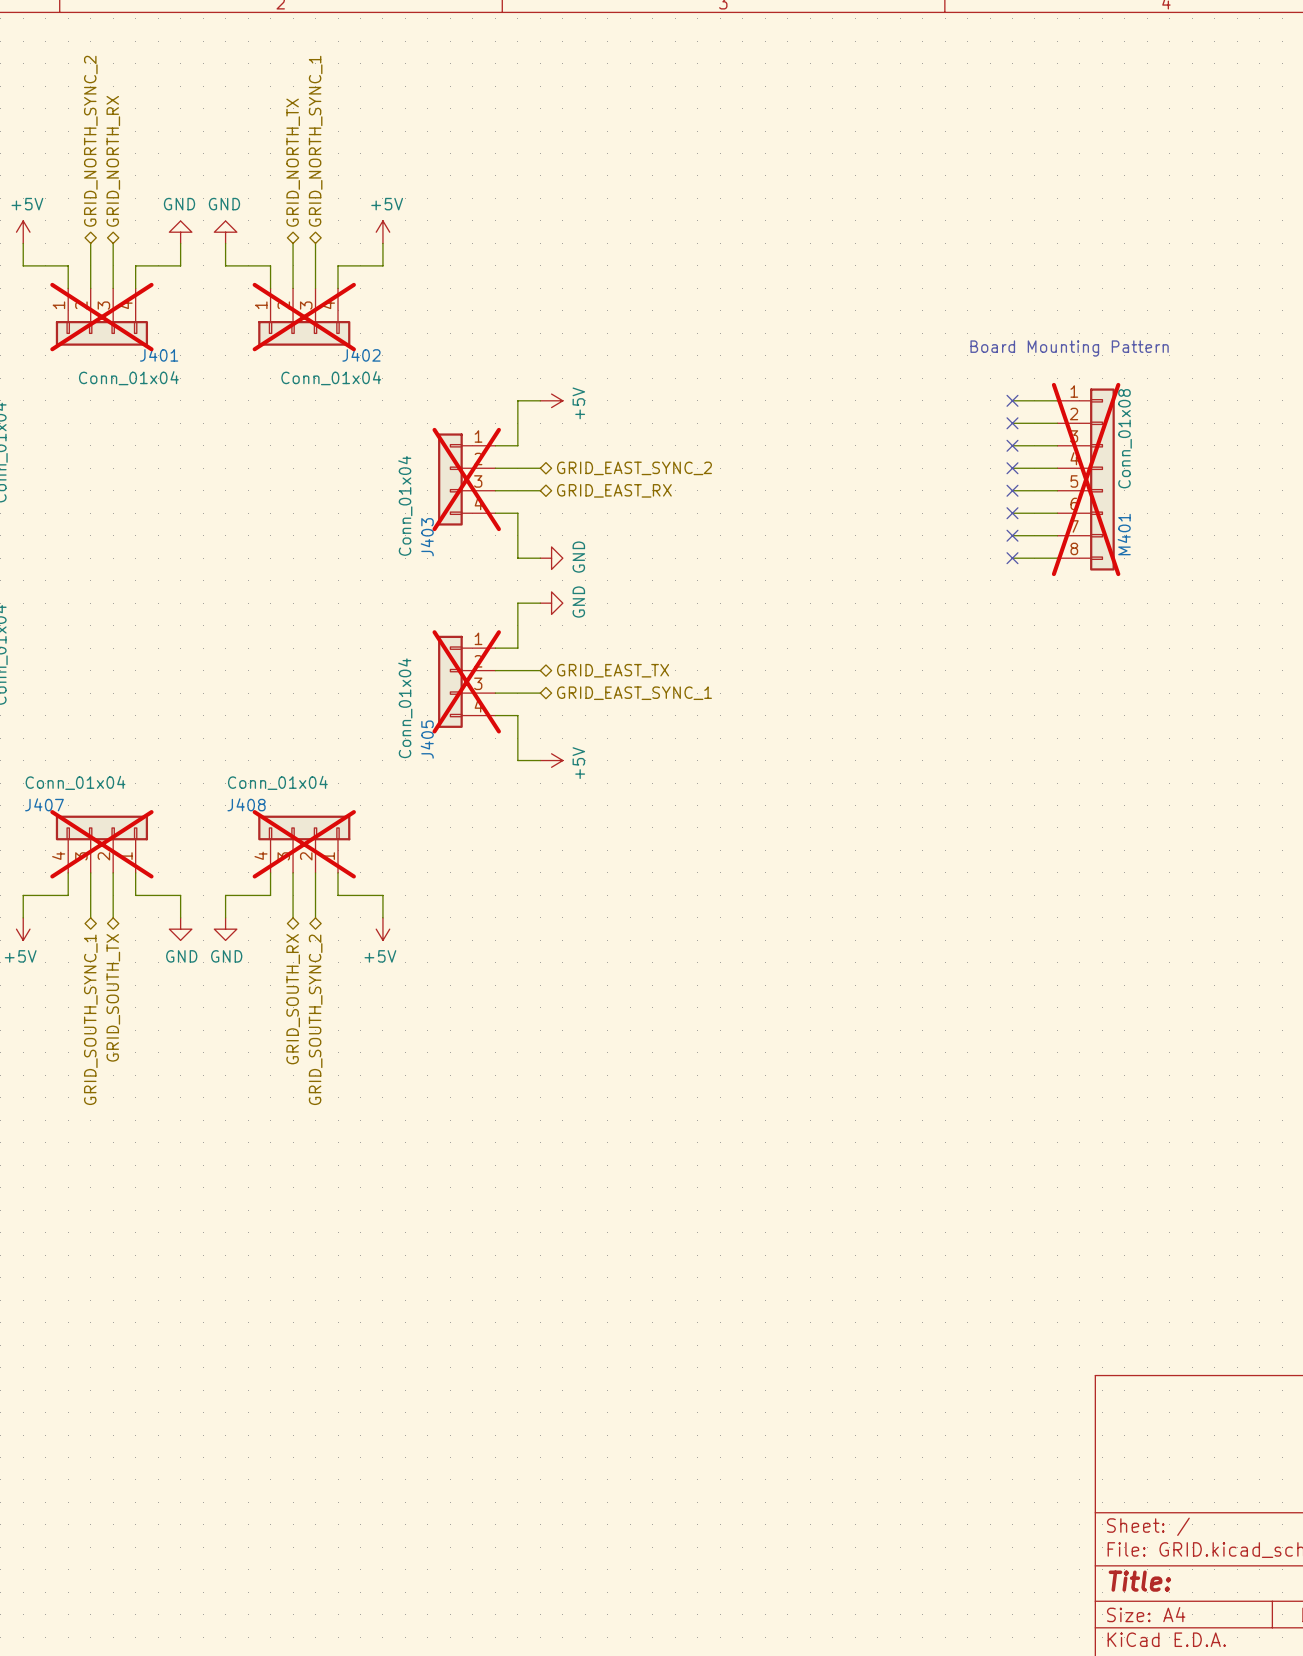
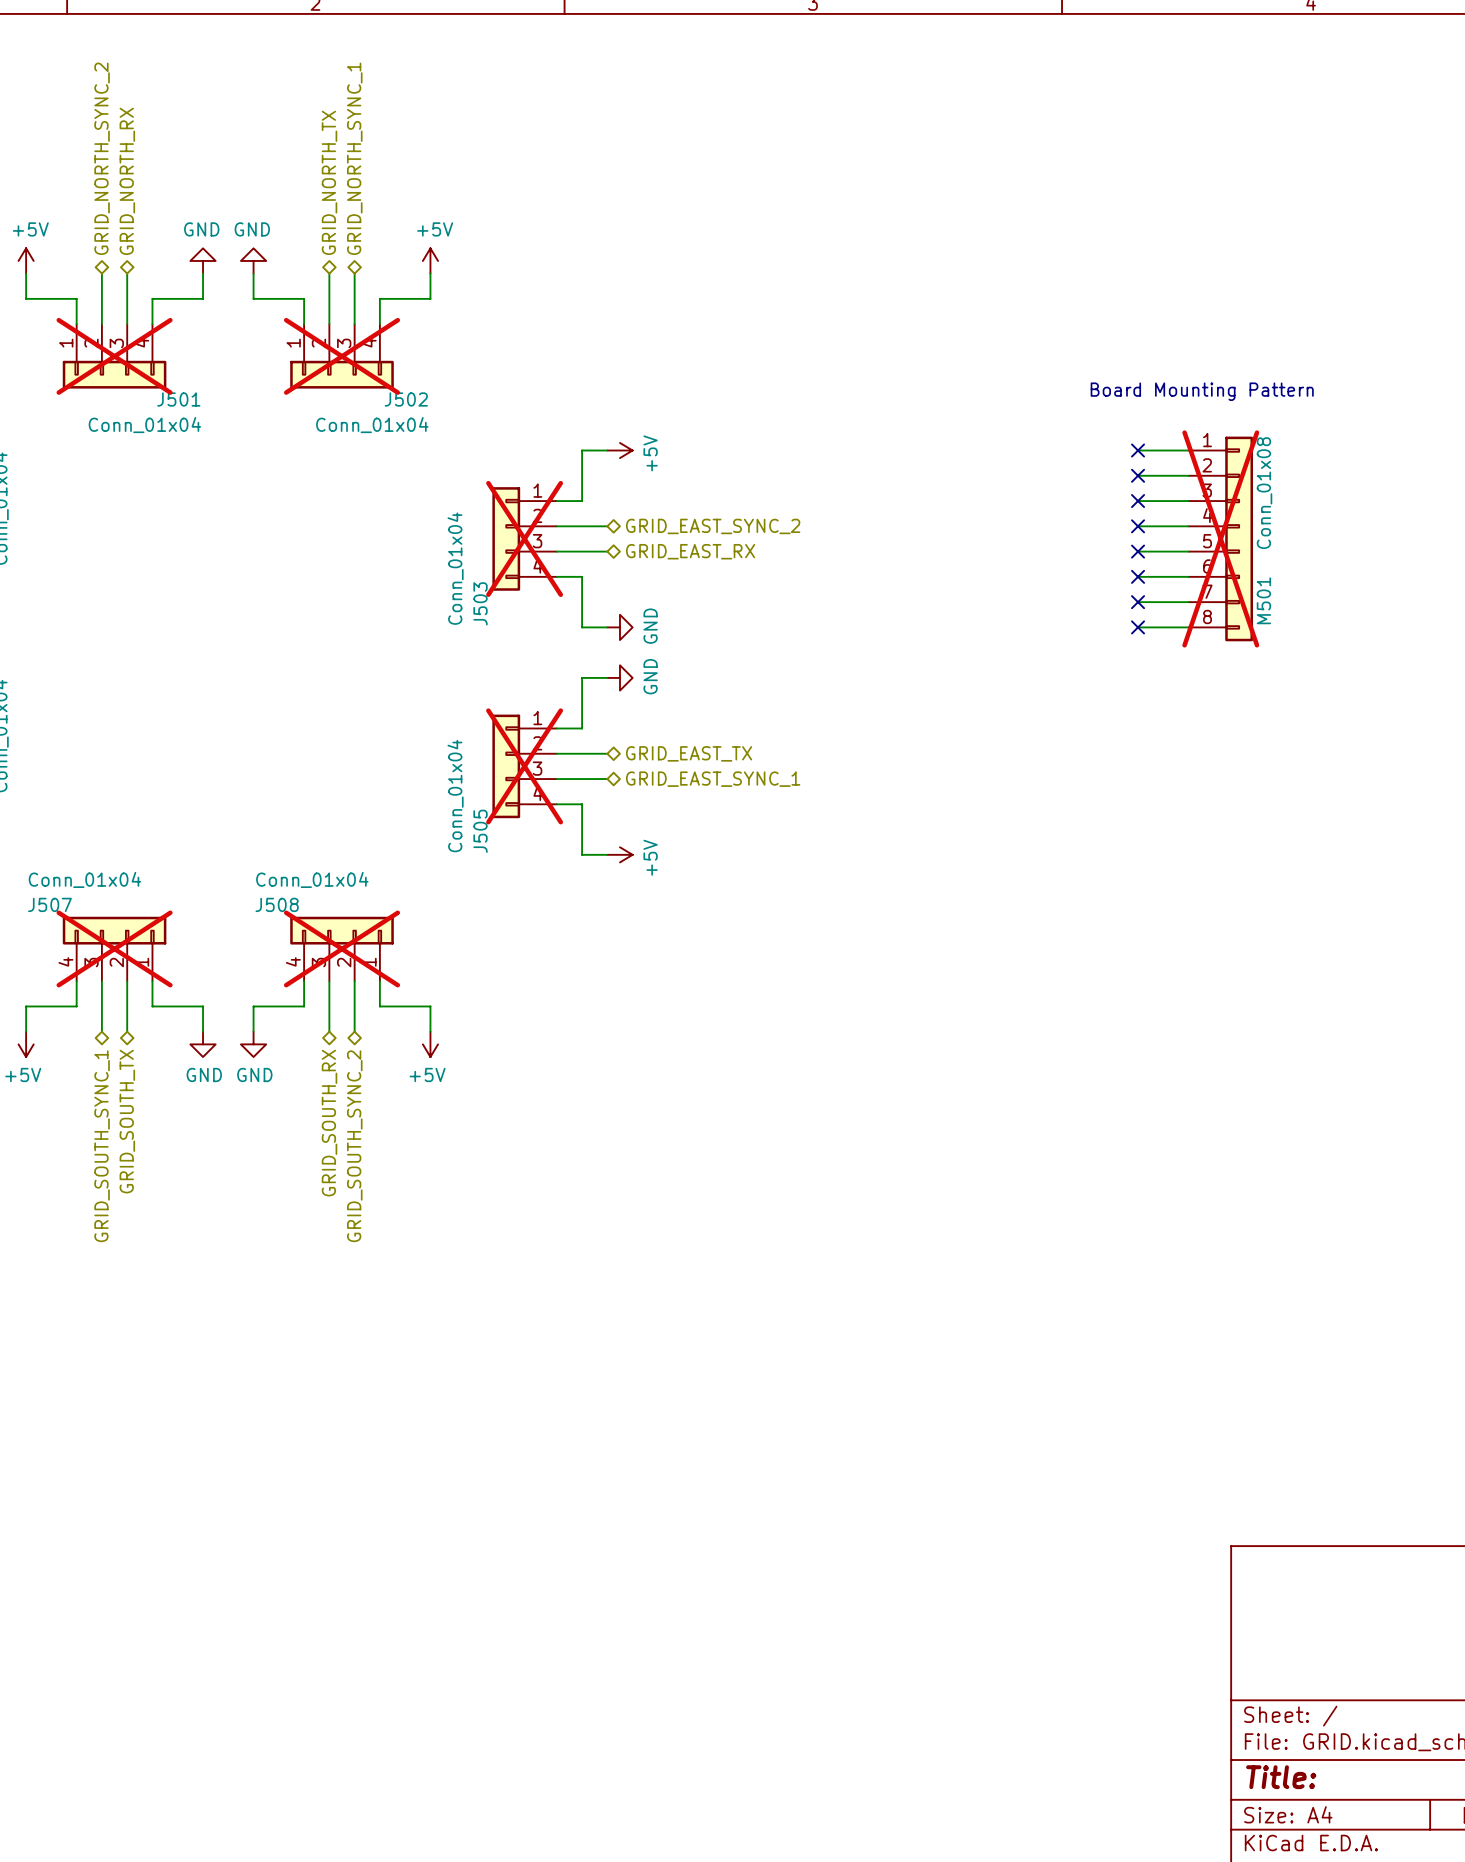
J401 name: J401 (159, 355) -> J501 (178, 399)
J402 name: J402 (361, 355) -> J502 (406, 399)
M401 name: M401 (1124, 534) -> M501 (1263, 600)
J403 name: J403 (427, 537) -> J503 (480, 603)
J405 name: J405 (427, 739) -> J505 (480, 831)
J407 name: J407 (44, 804) -> J507 (49, 904)
J408 name: J408 (246, 804) -> J508 (277, 904)

